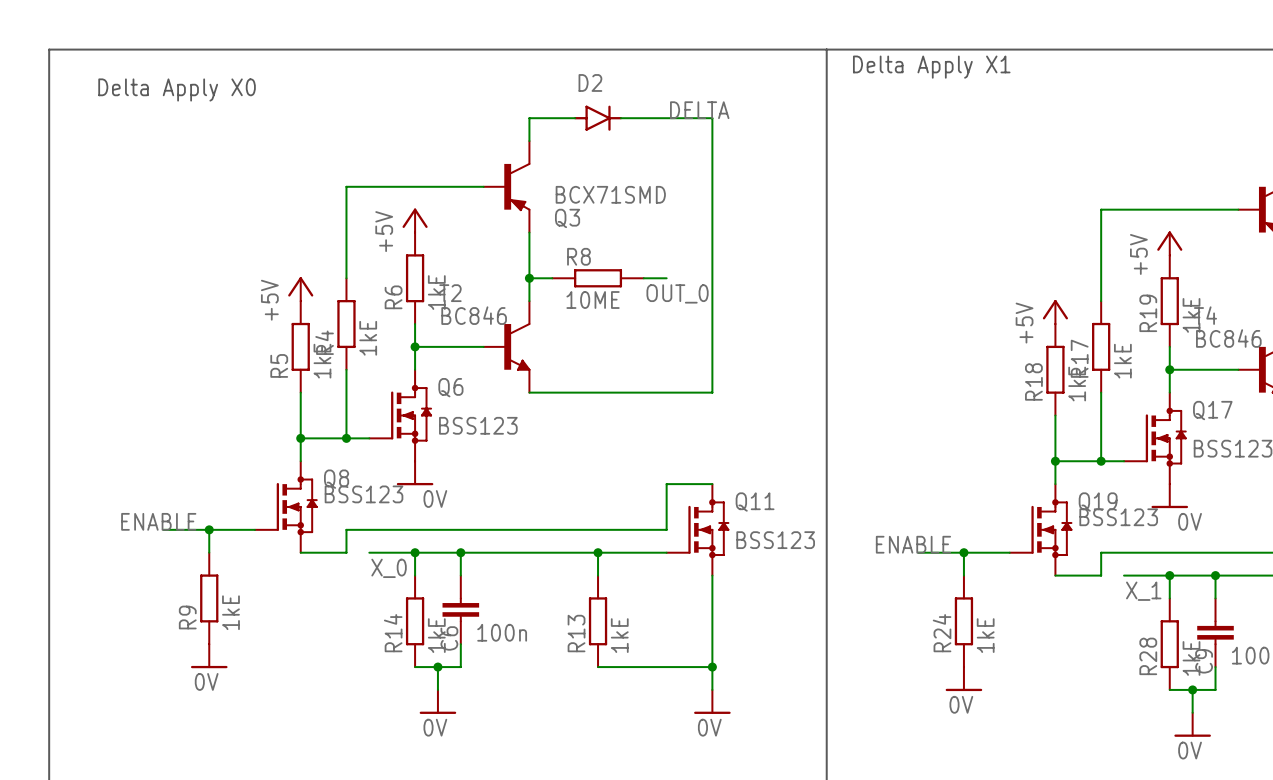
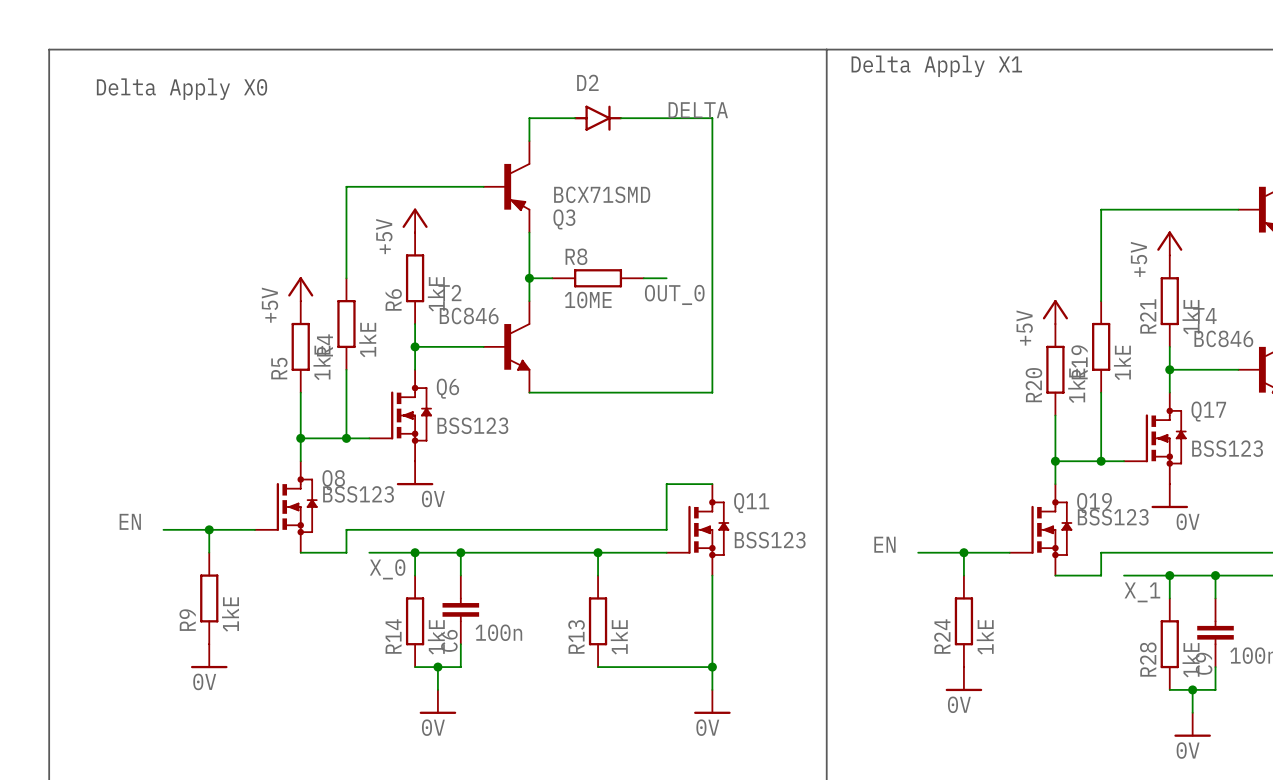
R19 name: R19 (1148, 313) -> R21 (1148, 316)
R17 name: R17 (1079, 358) -> R19 (1079, 362)
R18 name: R18 (1033, 381) -> R20 (1033, 385)
label: ENABLE (158, 521) -> EN (130, 521)
label: ENABLE (913, 544) -> EN (884, 544)

